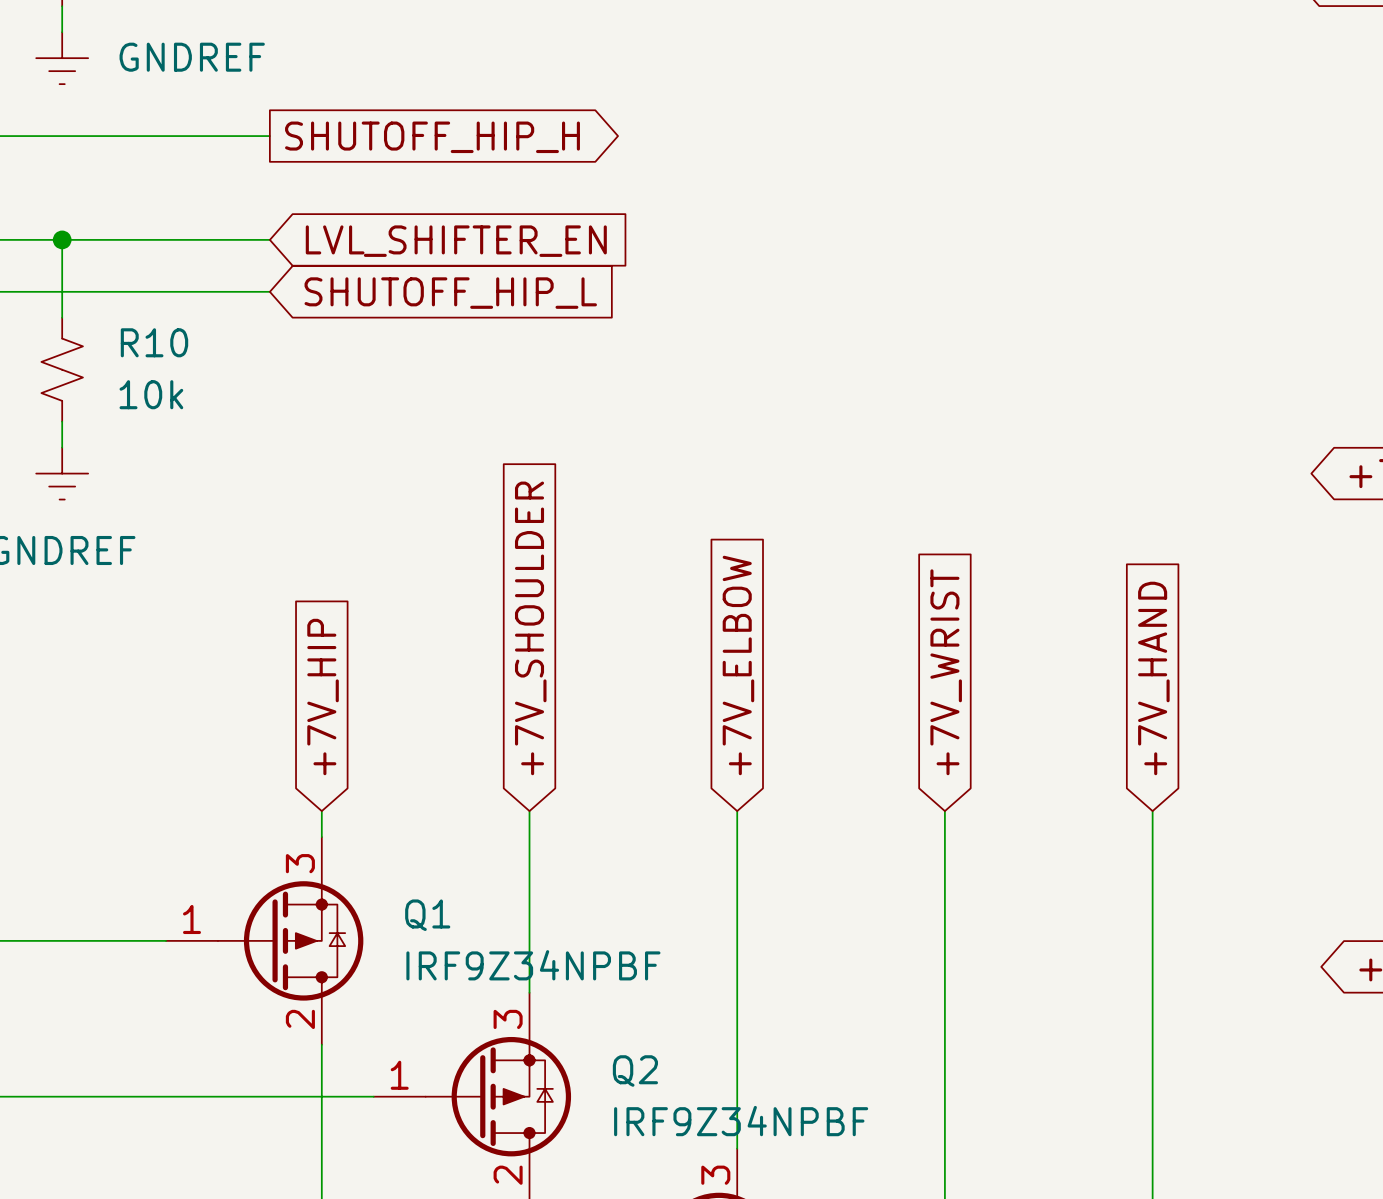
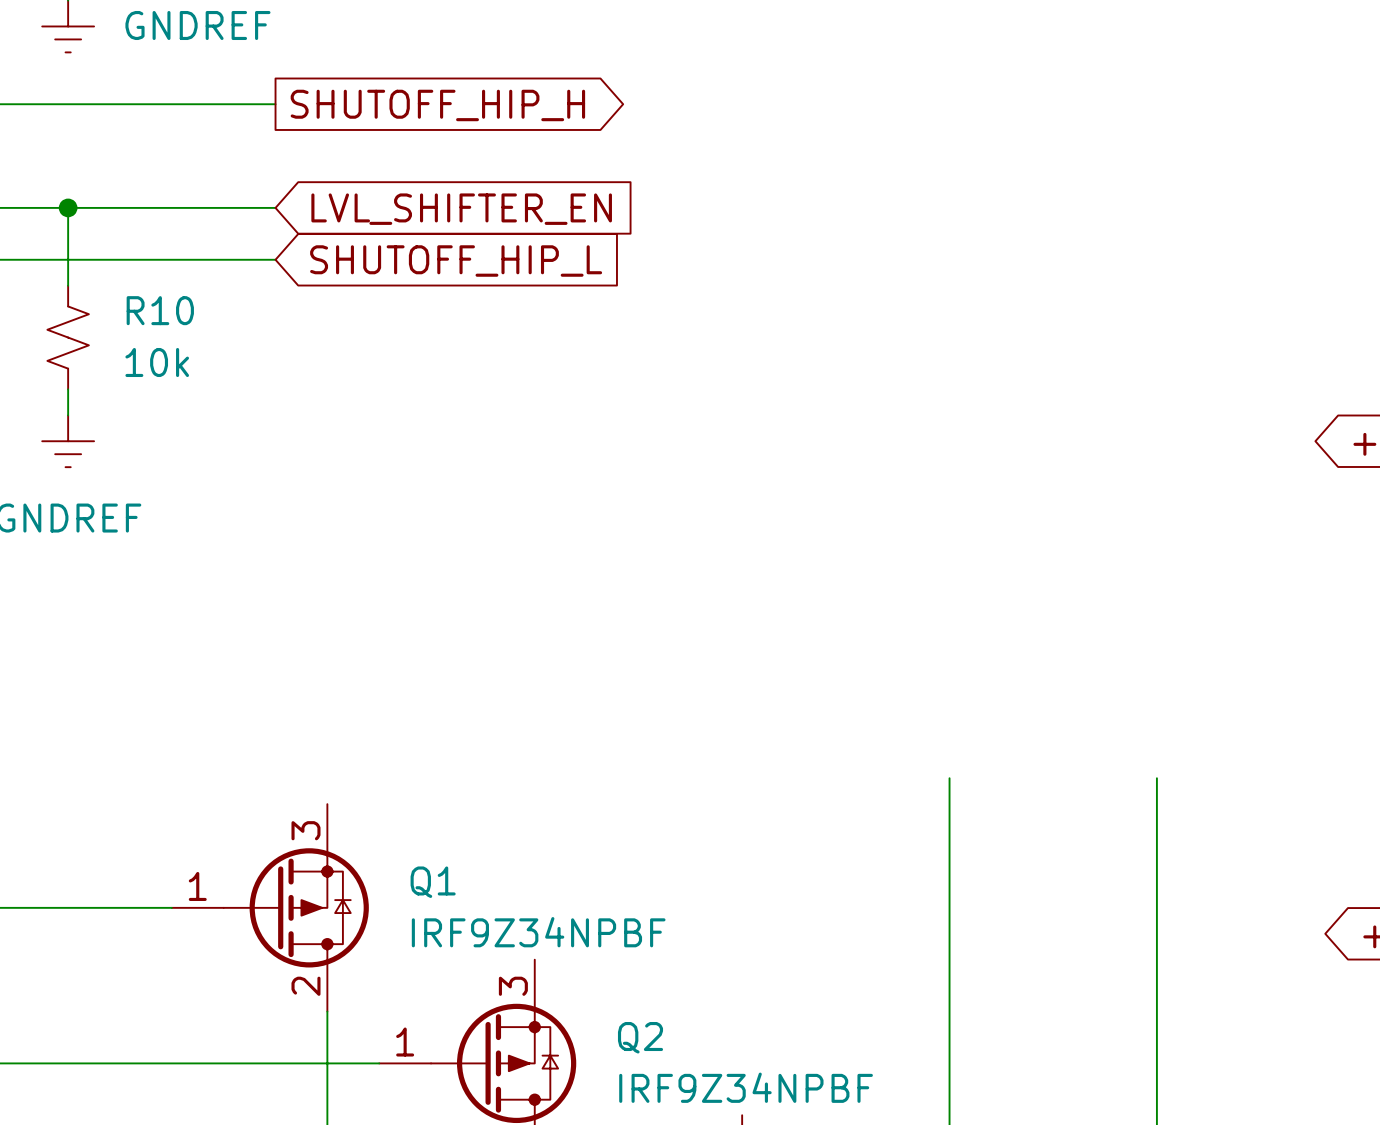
global label: +7V_SHOULDER (530, 628) -> none
global label: +7V_ELBOW (738, 665) -> none
global label: +7V_WRIST (946, 672) -> none
global label: +7V_HAND (1153, 678) -> none
global label: +7V_HIP (323, 697) -> none
wire: (321, 811) (321, 837) -> none
wire: (529, 811) (529, 992) -> none
wire: (737, 811) (737, 1148) -> none

